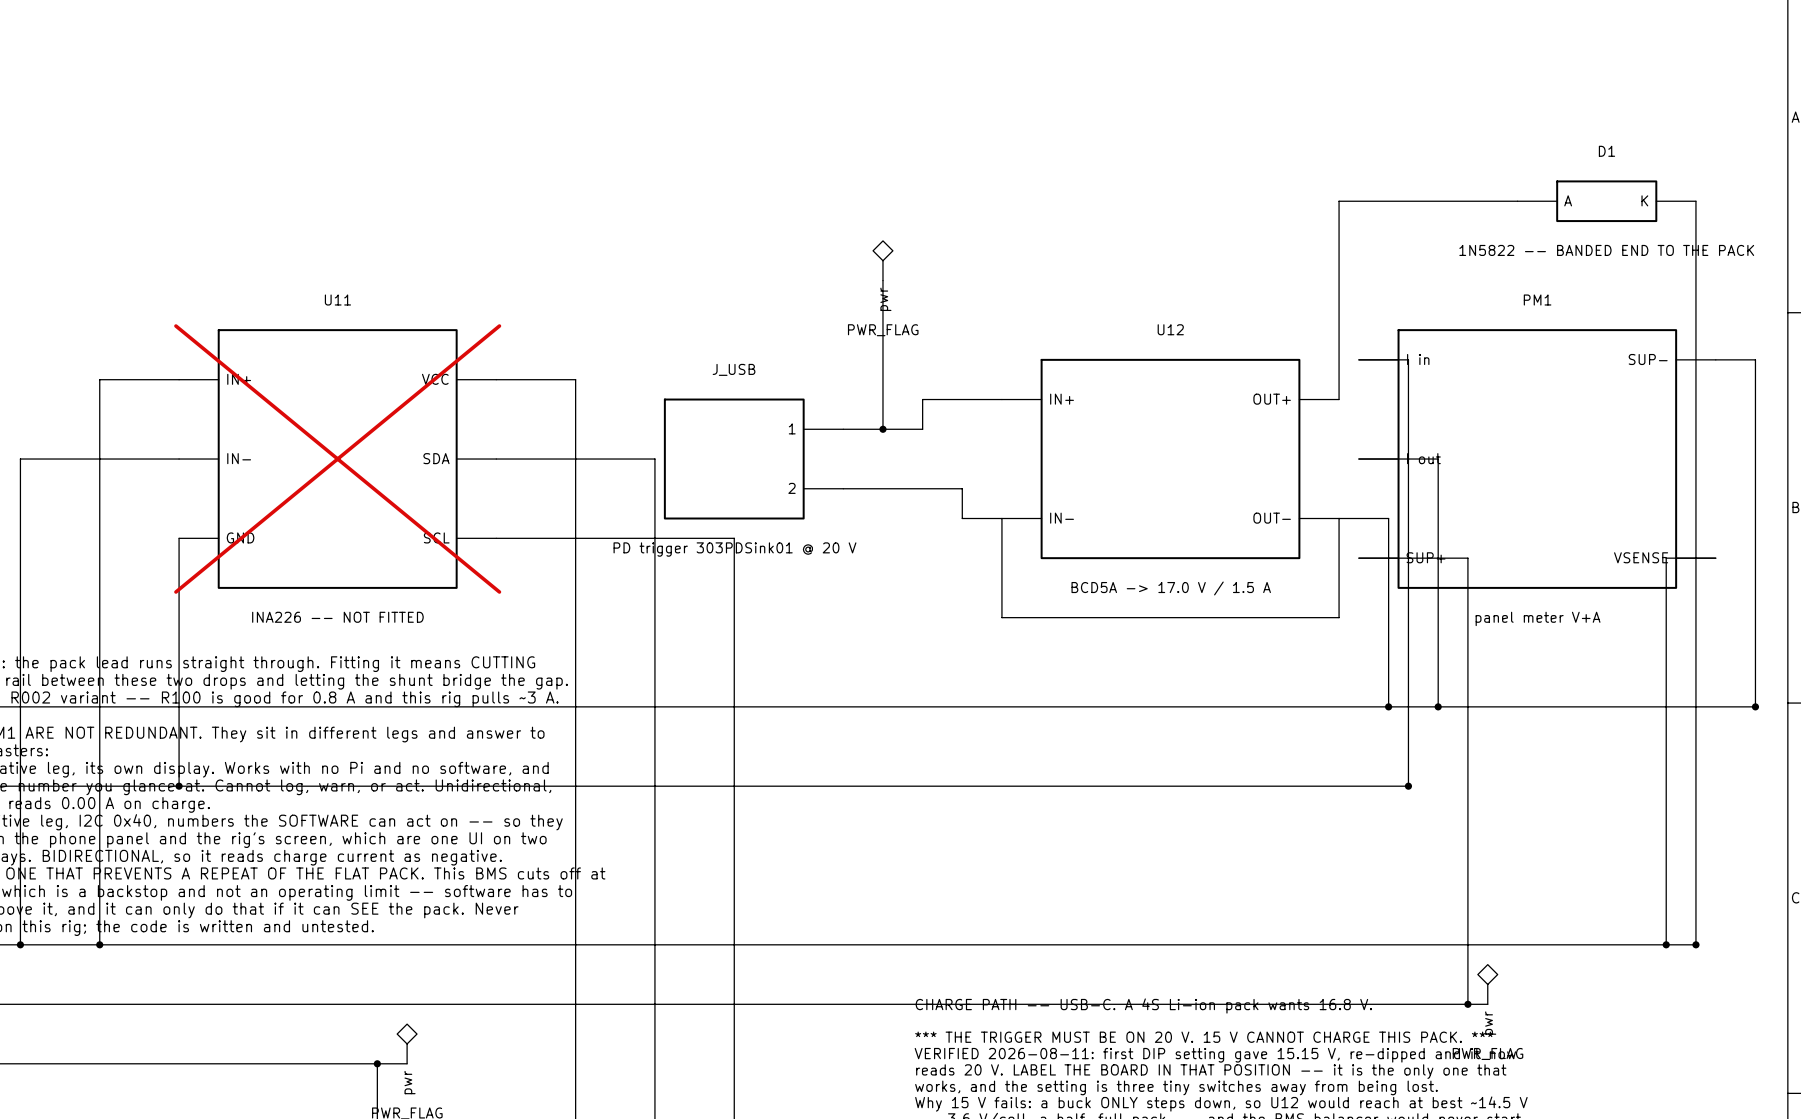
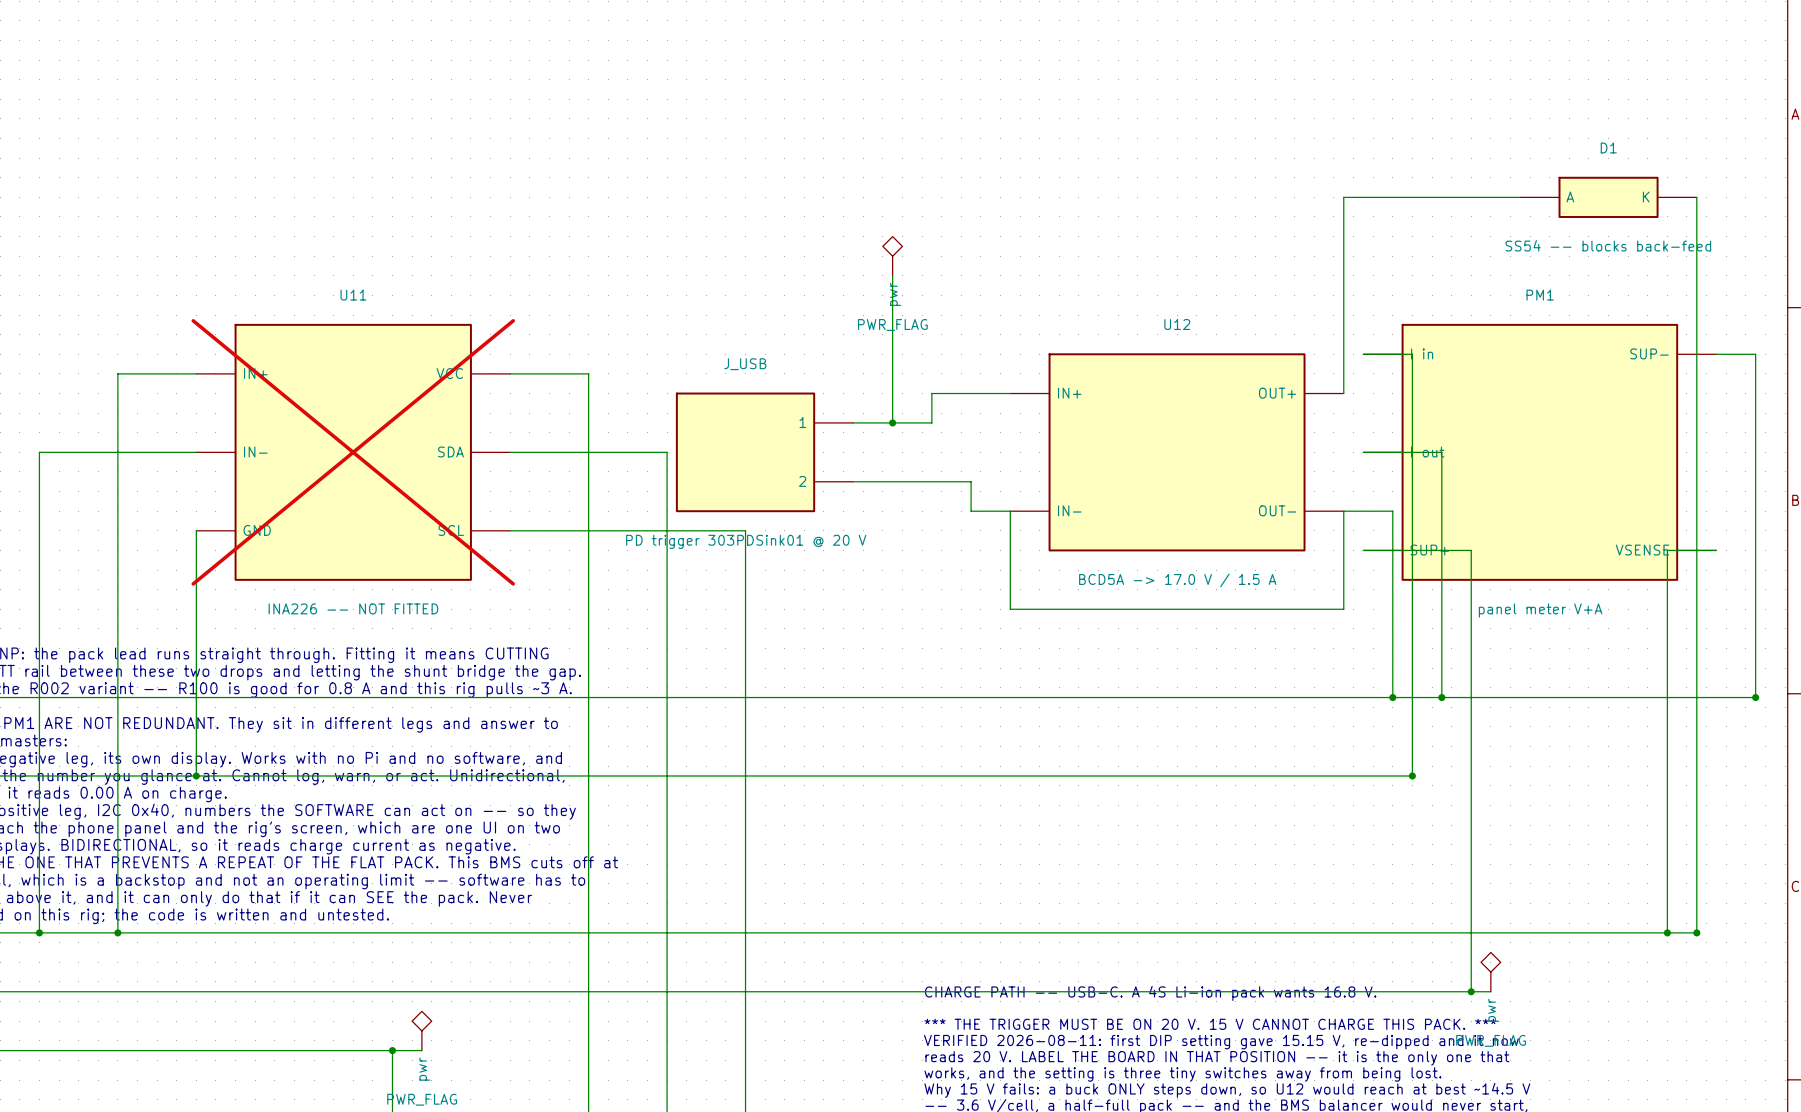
D1 value: 1N5822 -- BANDED END TO THE PACK (1606, 250) -> SS54 -- blocks back-feed (1608, 245)

